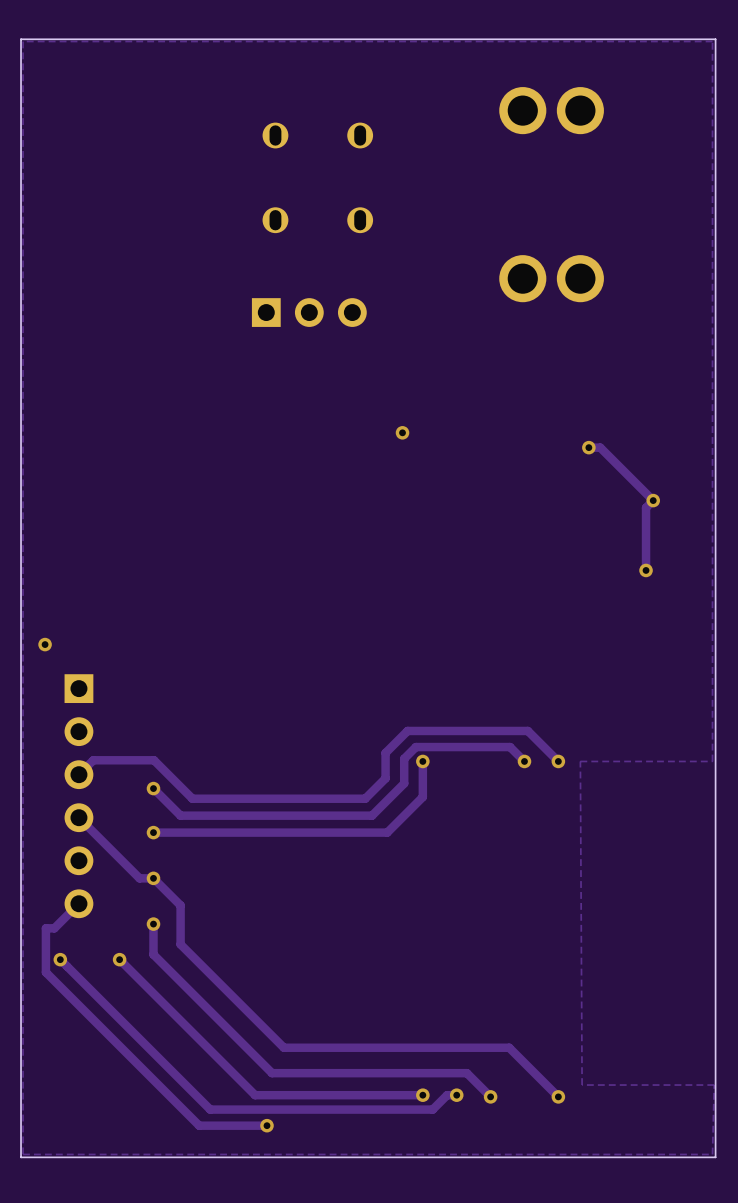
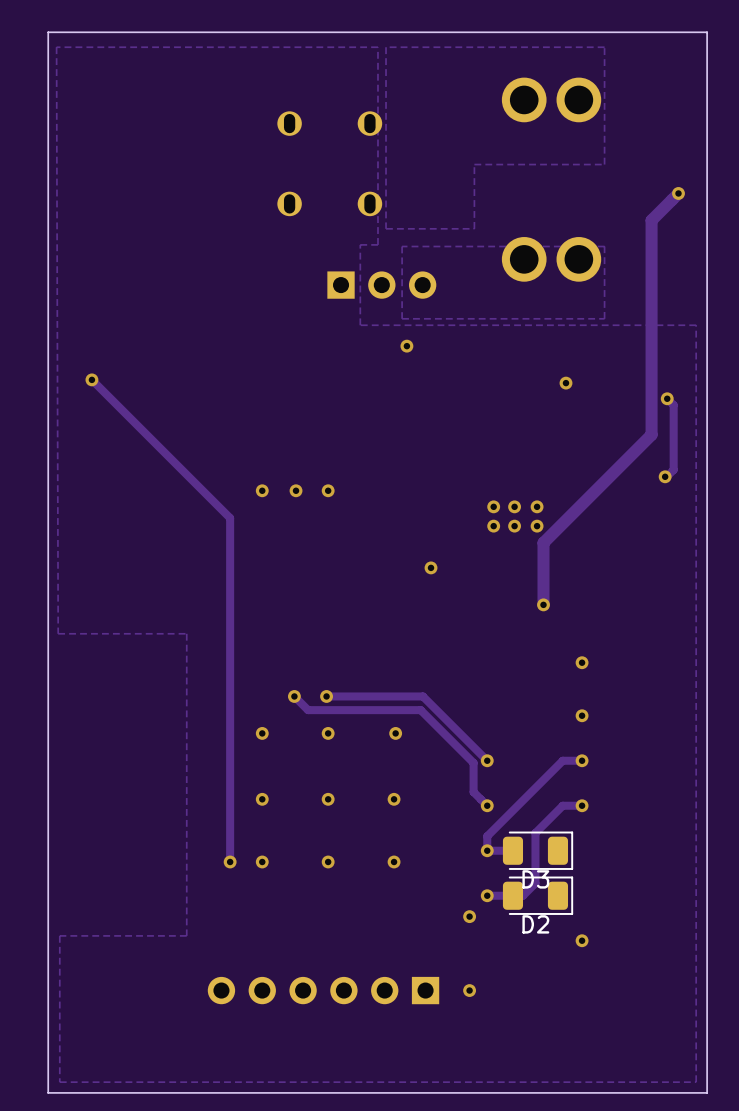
zone outline: (712, 41) (712, 761) (580, 761) (582, 1085) (714, 1085) (712, 1154) (23, 1154) (23, 41) (712, 41) -> (377, 47) (377, 244) (360, 244) (360, 325) (696, 325) (696, 1082) (59, 1082) (59, 935) (186, 935) (186, 633) (58, 633) (56, 47) (377, 47)
zone outline: none -> (604, 47) (604, 164) (474, 164) (474, 228) (386, 228) (386, 47) (604, 47)
track: none -> (678, 193) (651, 220) (651, 434) (543, 542) (543, 604)
via: none -> (678, 193)
zone outline: none -> (604, 246) (604, 318) (402, 318) (402, 246) (604, 246)
part position: (309, 312) -> (381, 285)
via: none -> (406, 346)
track: none -> (91, 379) (230, 518) (230, 861)
via: none -> (91, 379)
via: none -> (566, 383)
track: none -> (667, 398) (673, 405) (673, 469) (665, 477)
via: none -> (667, 398)
via: (402, 432) -> none
track: (588, 447) (600, 447) (653, 500) (646, 507) (646, 570) -> none
via: (588, 447) -> none
via position: (653, 500) -> (665, 476)
via: none -> (262, 490)
via: none -> (296, 490)
via: none -> (328, 490)
via: none -> (493, 506)
via: none -> (514, 506)
via: none -> (537, 506)
via: none -> (493, 526)
via: none -> (514, 526)
via: none -> (537, 526)
via: (646, 570) -> none
via: none -> (431, 567)
via: none -> (543, 604)
via: (45, 644) -> none
via: none -> (582, 662)
track: none -> (294, 696) (308, 710) (420, 710) (473, 762) (473, 792) (487, 805)
via: none -> (294, 696)
track: none -> (326, 696) (422, 696) (487, 760)
via: none -> (326, 696)
track: (422, 761) (422, 797) (387, 832) (153, 832) -> none
via: (422, 761) -> none
track: (524, 761) (510, 747) (415, 747) (404, 758) (404, 783) (372, 815) (180, 815) (153, 788) -> none
via: (524, 761) -> none
track: (558, 761) (527, 730) (407, 730) (385, 752) (385, 778) (365, 798) (192, 798) (154, 760) (93, 760) (78, 774) -> none
via position: (558, 761) -> (582, 715)
via: none -> (262, 733)
via: none -> (328, 733)
via: none -> (395, 733)
via: (153, 788) -> none
part rotation: 0° (78, 796) -> 90° clockwise (323, 990)
part position: (78, 796) -> (323, 990)
via: none -> (487, 760)
track: none -> (582, 760) (562, 760) (487, 836) (487, 850) (512, 850)
via: none -> (582, 760)
track: (78, 817) (139, 878) (153, 878) (180, 905) (180, 944) (283, 1047) (509, 1047) (558, 1096) -> none
via: (153, 832) -> none
via: none -> (262, 799)
via: none -> (328, 799)
via: none -> (394, 799)
via: none -> (487, 805)
track: none -> (582, 805) (562, 805) (535, 833) (535, 883) (523, 895) (487, 895)
via: none -> (582, 805)
via: (153, 878) -> none
via: none -> (487, 850)
D3: none -> (538, 850)
track: (78, 903) (54, 928) (45, 928) (45, 972) (199, 1125) (266, 1125) -> none
via: none -> (230, 861)
via: none -> (262, 861)
via: none -> (328, 861)
via: none -> (394, 861)
track: (153, 924) (153, 954) (272, 1073) (466, 1073) (490, 1096) -> none
via: (153, 924) -> none
via: none -> (487, 895)
D2: none -> (538, 895)
track: (60, 959) (210, 1109) (432, 1109) (447, 1095) (456, 1095) -> none
via: (60, 959) -> none
track: (119, 959) (255, 1095) (422, 1095) -> none
via: (119, 959) -> none
via: none -> (469, 916)
via: none -> (582, 940)
via: none -> (469, 990)
via: (422, 1095) -> none
via: (456, 1095) -> none
via: (490, 1096) -> none
via: (558, 1096) -> none
via: (266, 1125) -> none

